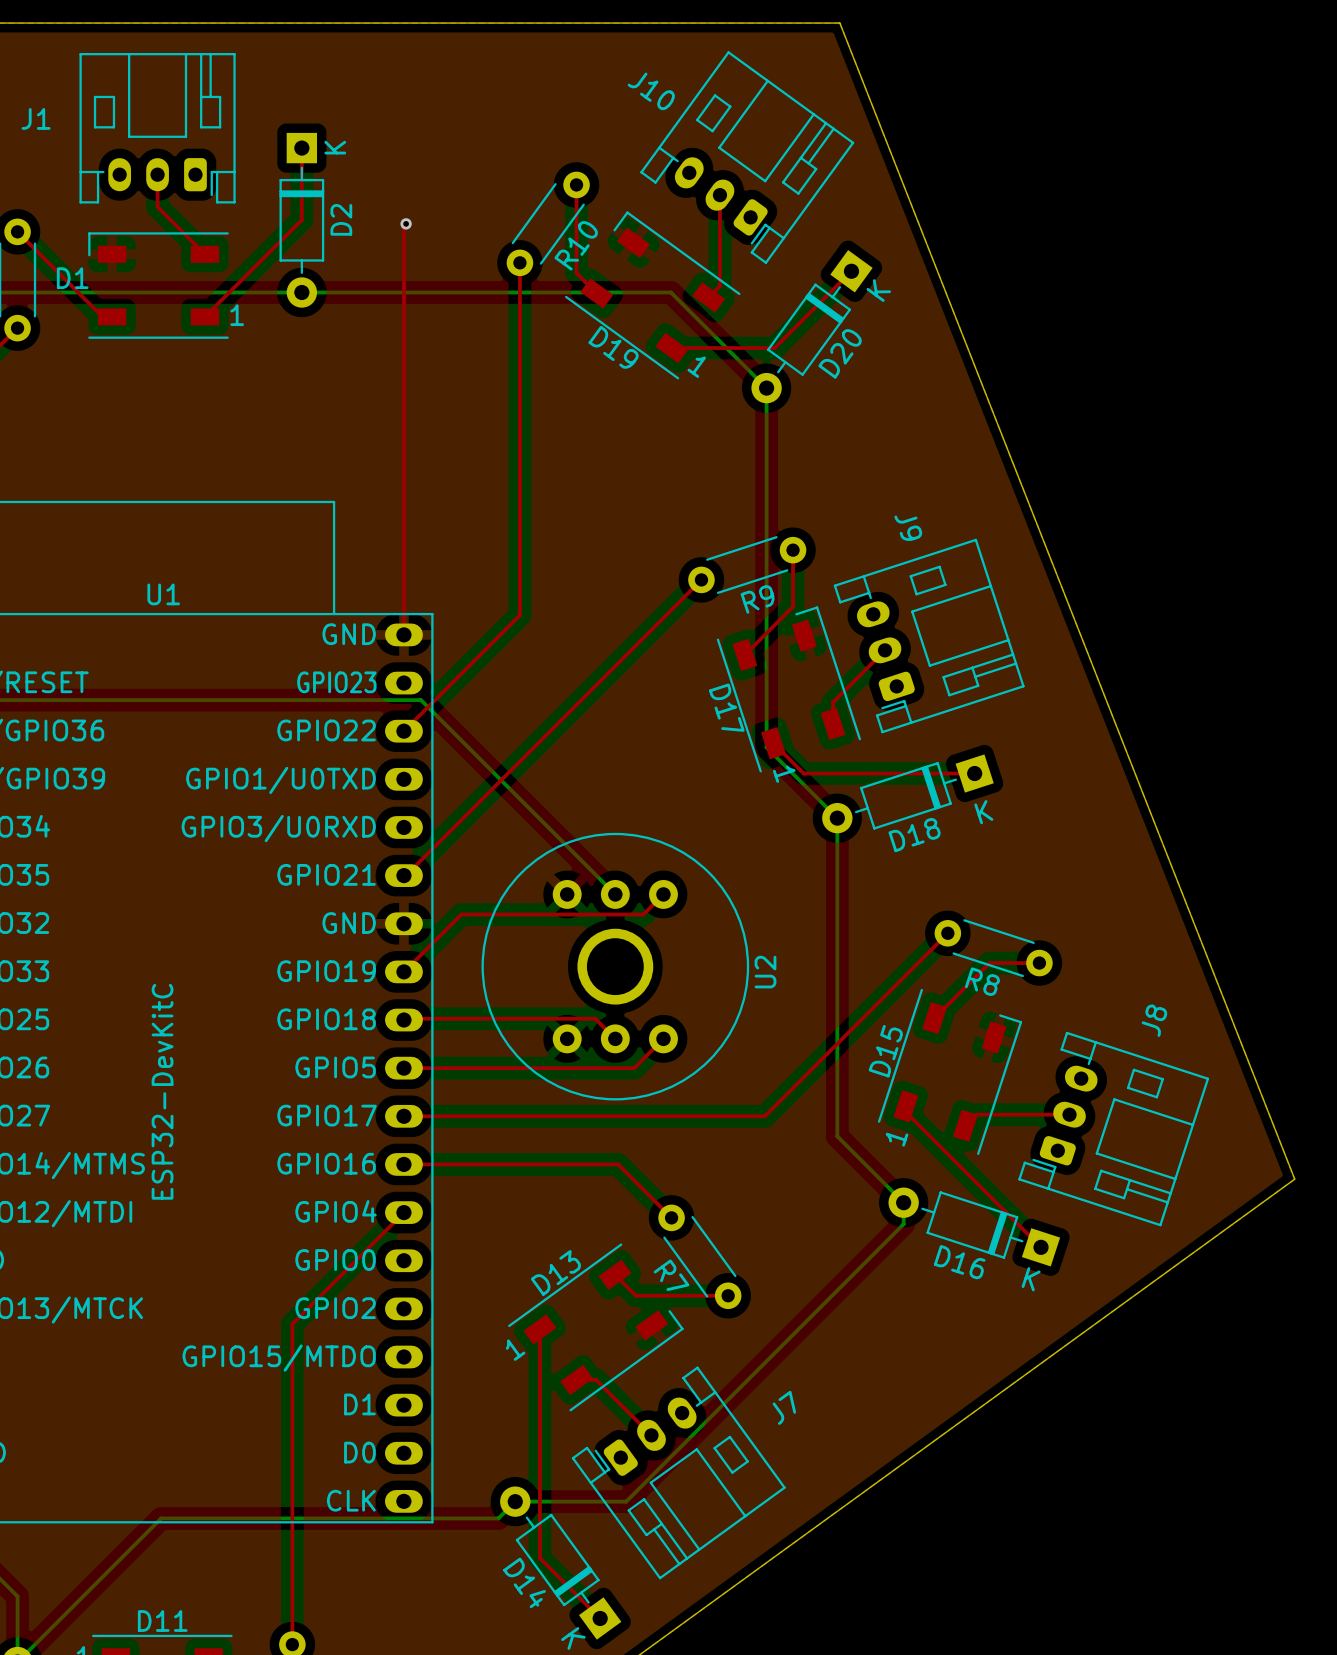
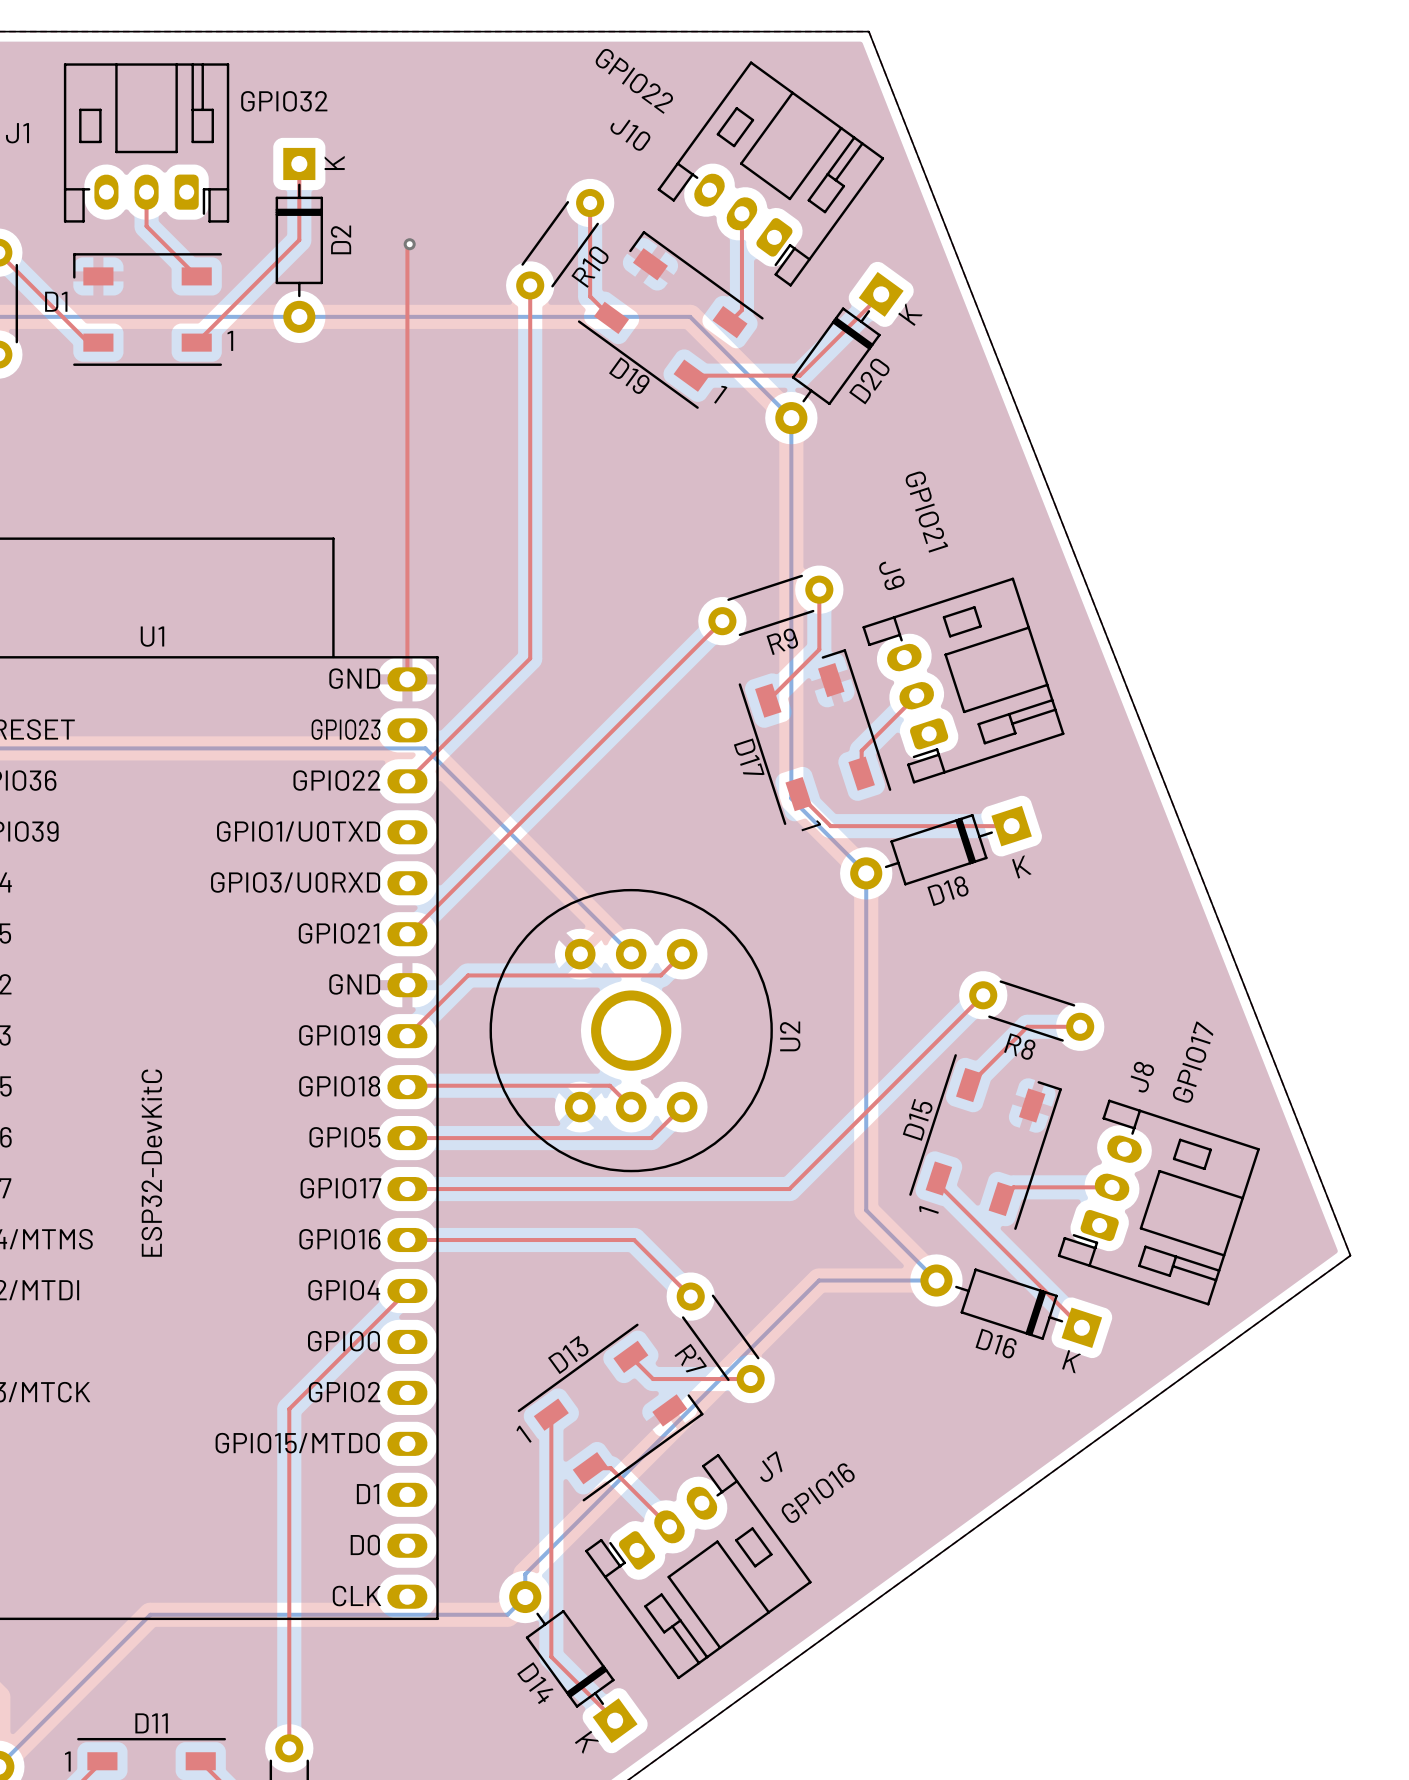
text: none -> GPIO22 (634, 81)
text: none -> GPIO32 (284, 101)
J10 name position: J10 (651, 91) -> J10 (630, 135)
text: none -> GPIO21 (926, 512)
J9 name position: J9 (908, 528) -> J9 (891, 576)
text: none -> GPIO17 (1193, 1062)
J8 name position: J8 (1154, 1020) -> J8 (1142, 1077)
bottom track: (903, 1202) (903, 1224) (626, 1501) (515, 1501) -> (936, 1280) (819, 1280) (525, 1574) (525, 1596)
text: none -> GPIO16 (818, 1493)
J7 name position: J7 (784, 1407) -> J7 (771, 1466)

